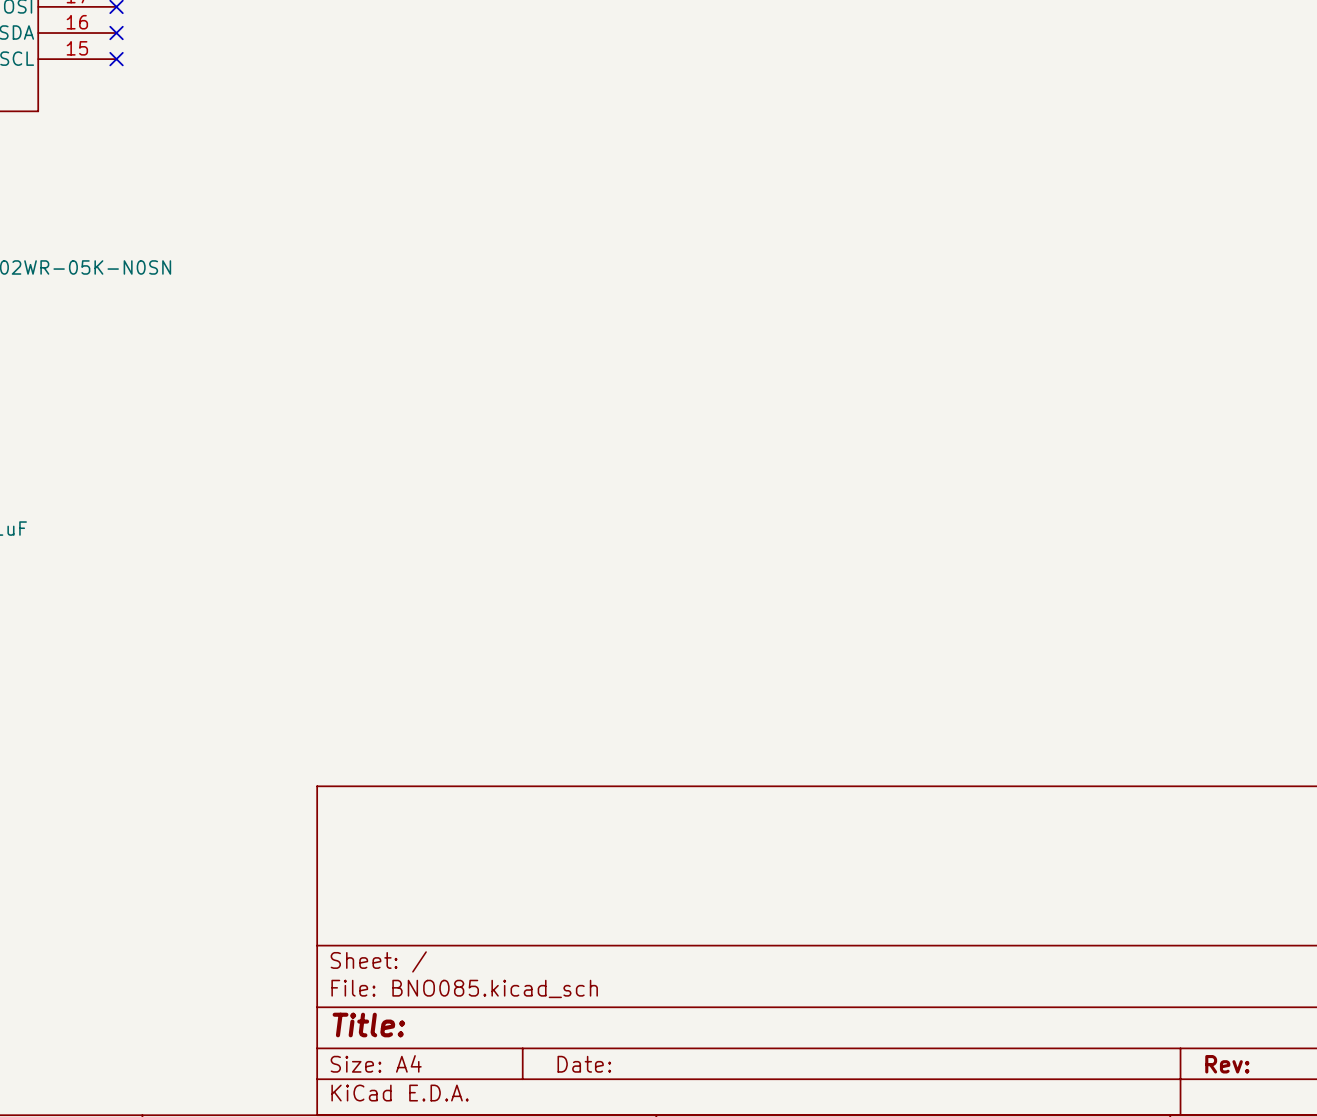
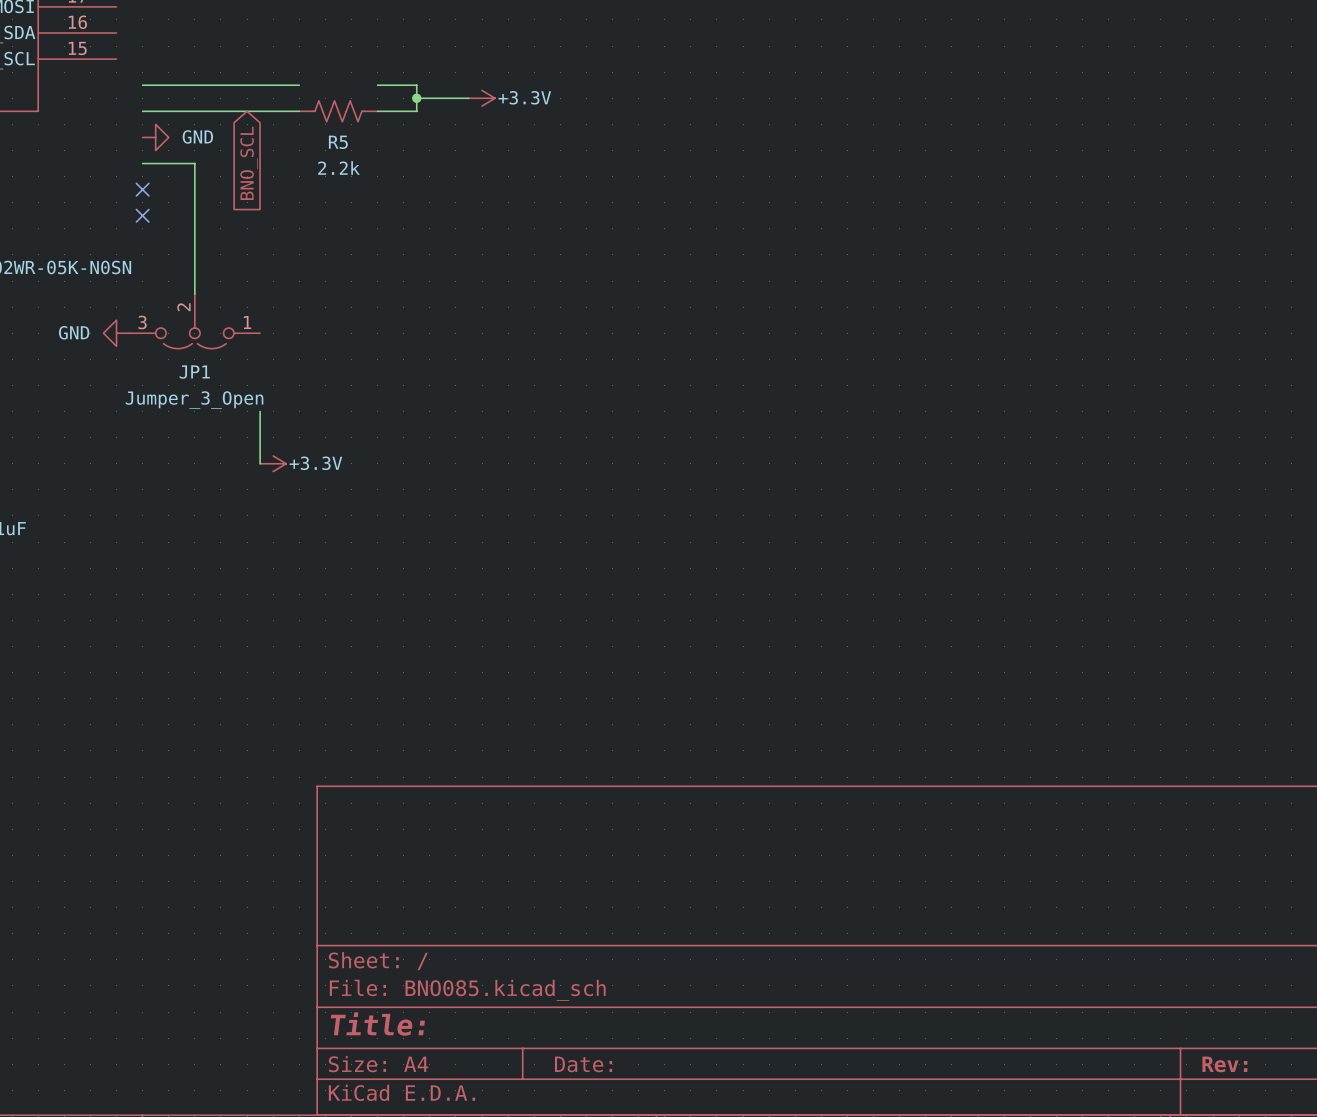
no-connect mark: (116, 6) -> none
no-connect mark: (116, 33) -> none
no-connect mark: (116, 59) -> none
wire: none -> (142, 85) (299, 85)
wire: none -> (377, 85) (416, 85) (416, 111) (377, 111)
wire: none -> (416, 98) (468, 98)
junction: none -> (416, 98)
power symbol: none -> +3.3V (482, 98)
wire: none -> (142, 111) (299, 111)
R5: none -> 2.2k (338, 111)
power symbol: none -> GND (155, 137)
wire: none -> (142, 163) (194, 163) (194, 294)
global label: none -> BNO_SCL (249, 163)
no-connect mark: none -> (142, 189)
no-connect mark: none -> (142, 215)
JP1: none -> Jumper_3_Open (194, 321)
power symbol: none -> GND (116, 333)
wire: none -> (260, 411) (260, 463)
power symbol: none -> +3.3V (273, 463)

